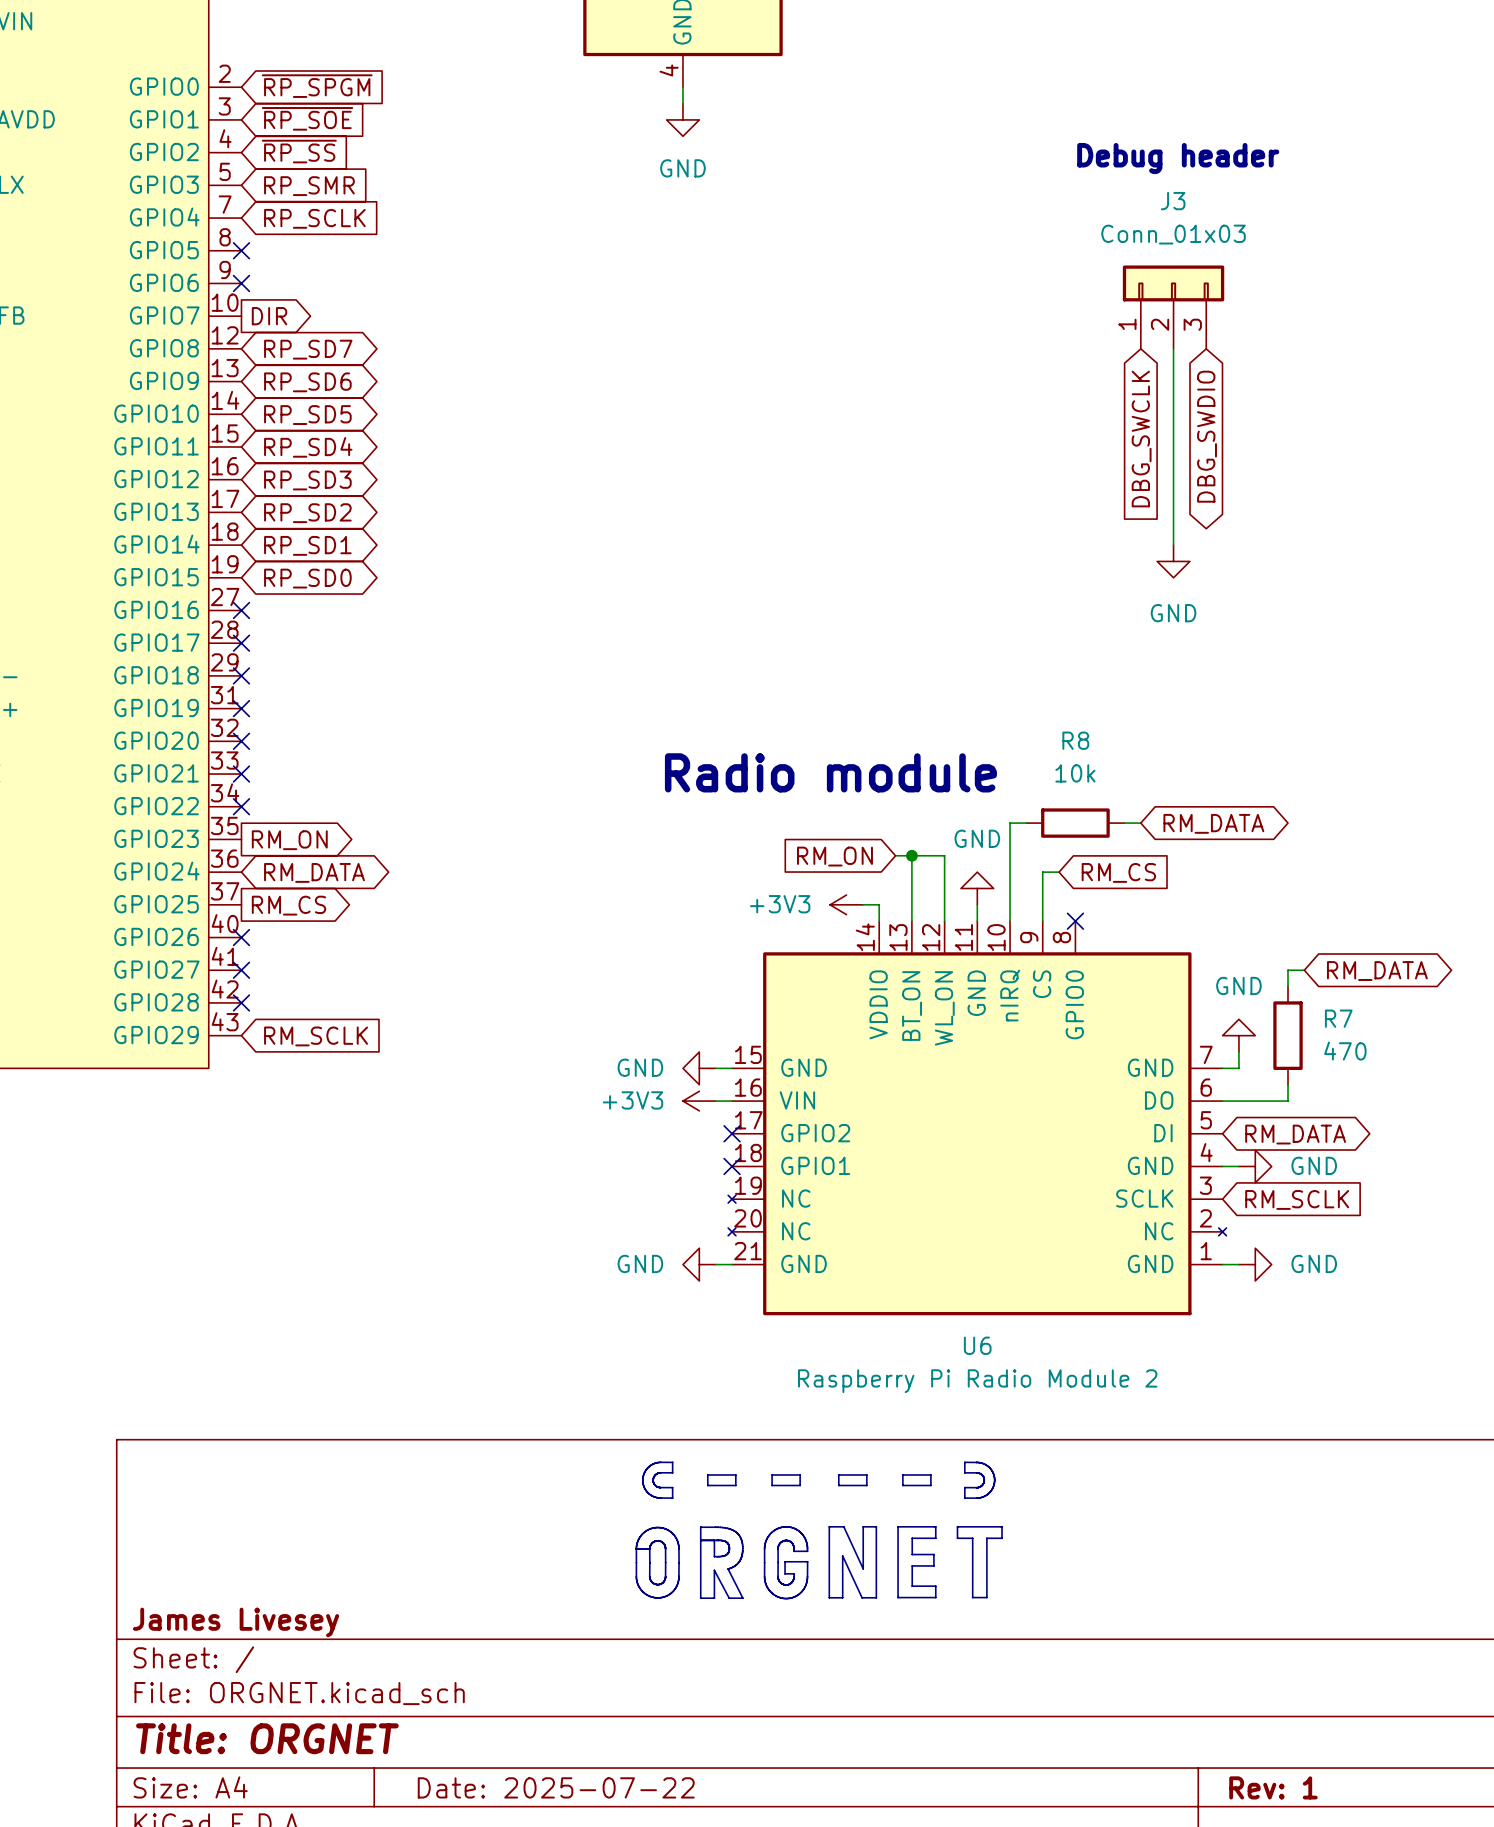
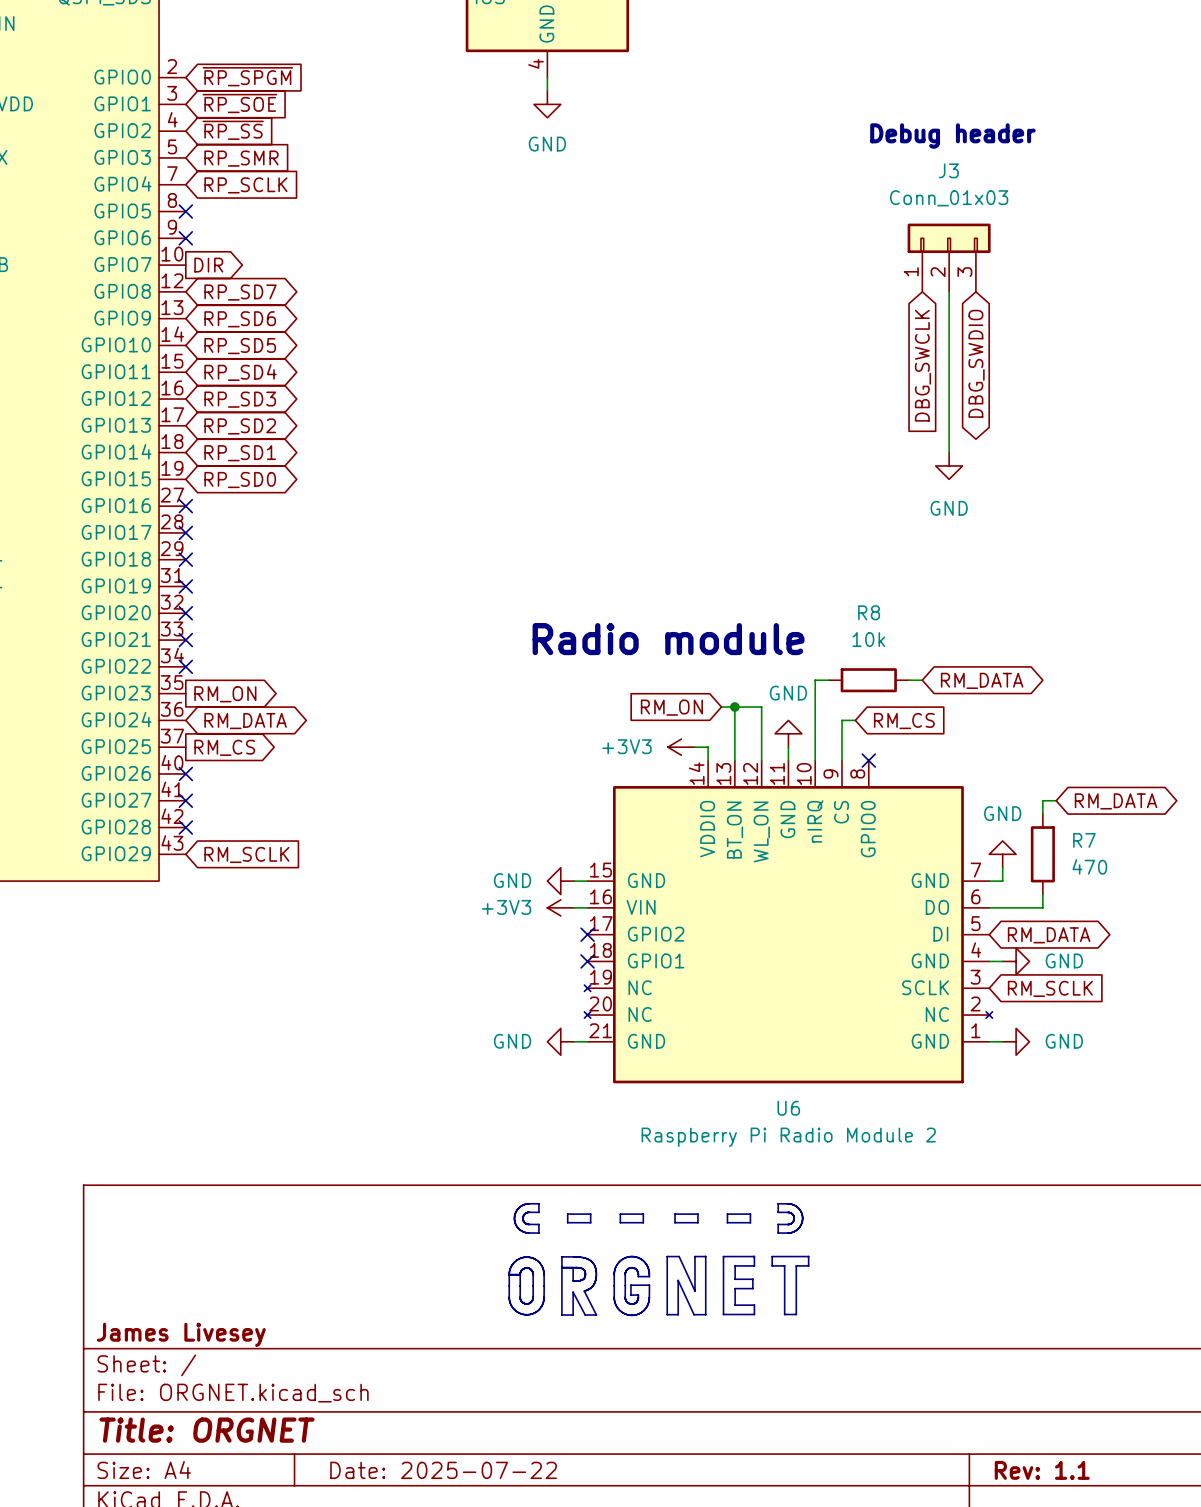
title block: Rev: 1 (1273, 1787) -> Rev: 1.1 (1042, 1470)

